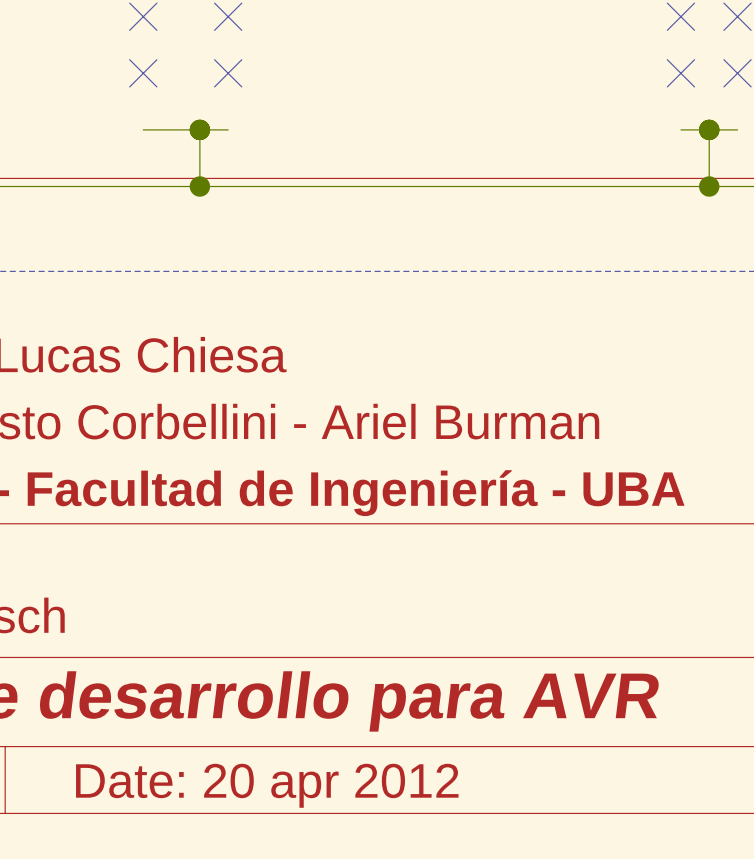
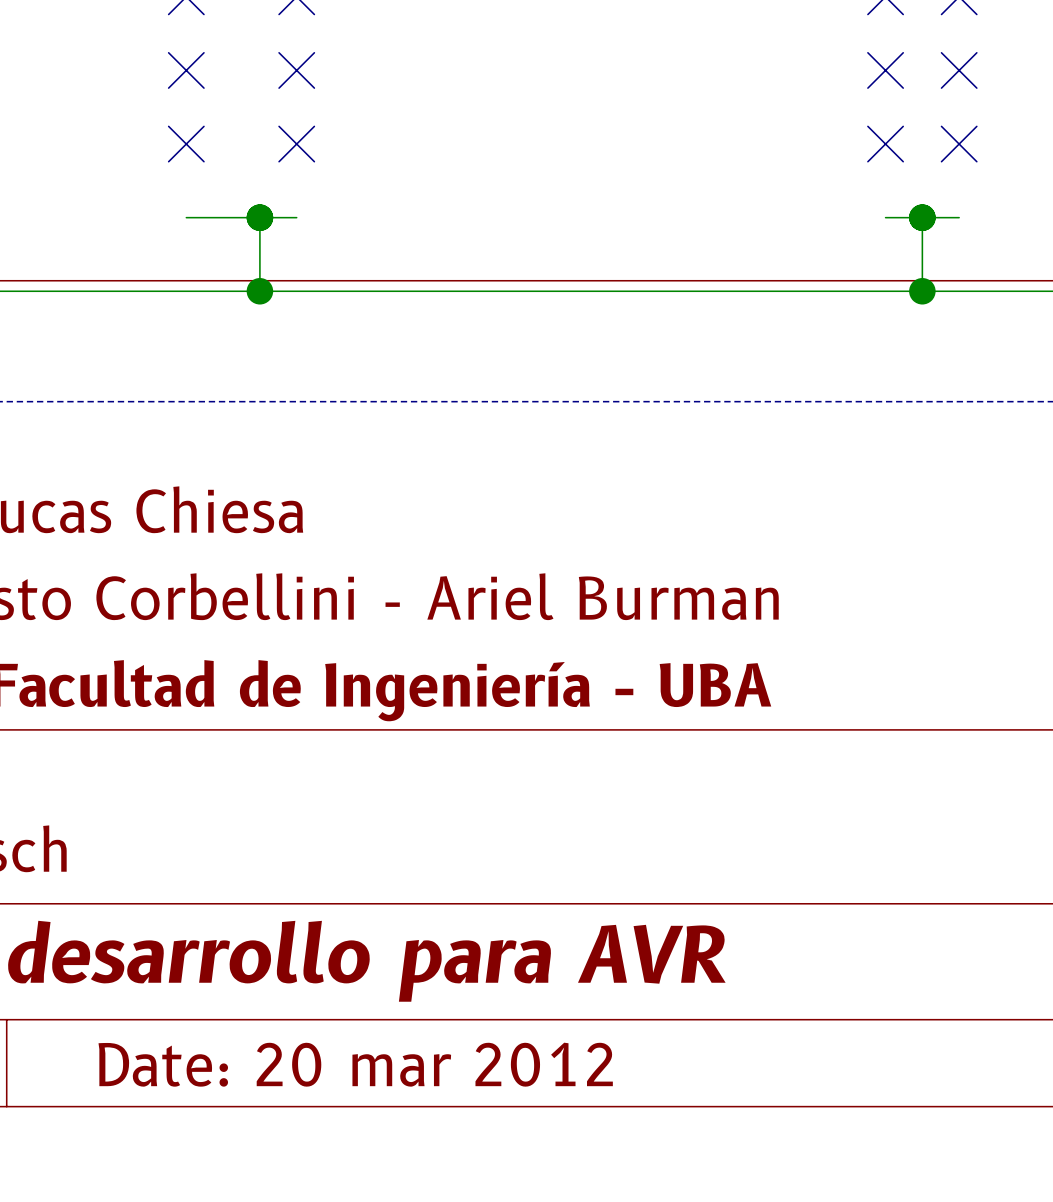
title block: Date: 20 apr 2012 (267, 785) -> Date: 20 mar 2012 (355, 1064)

